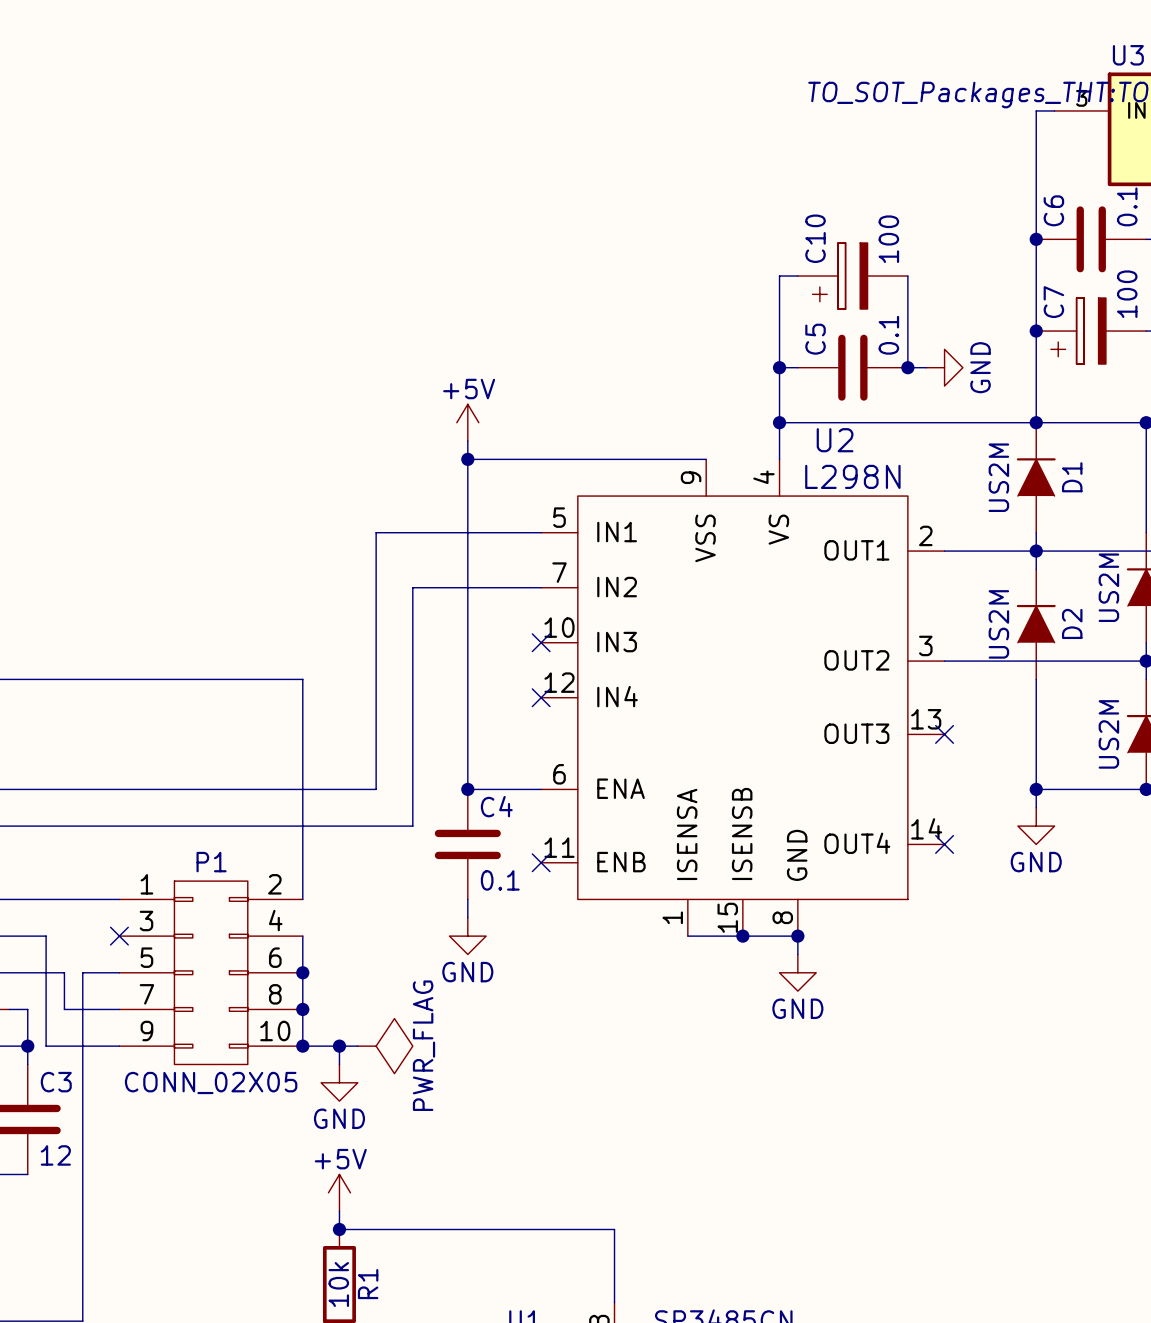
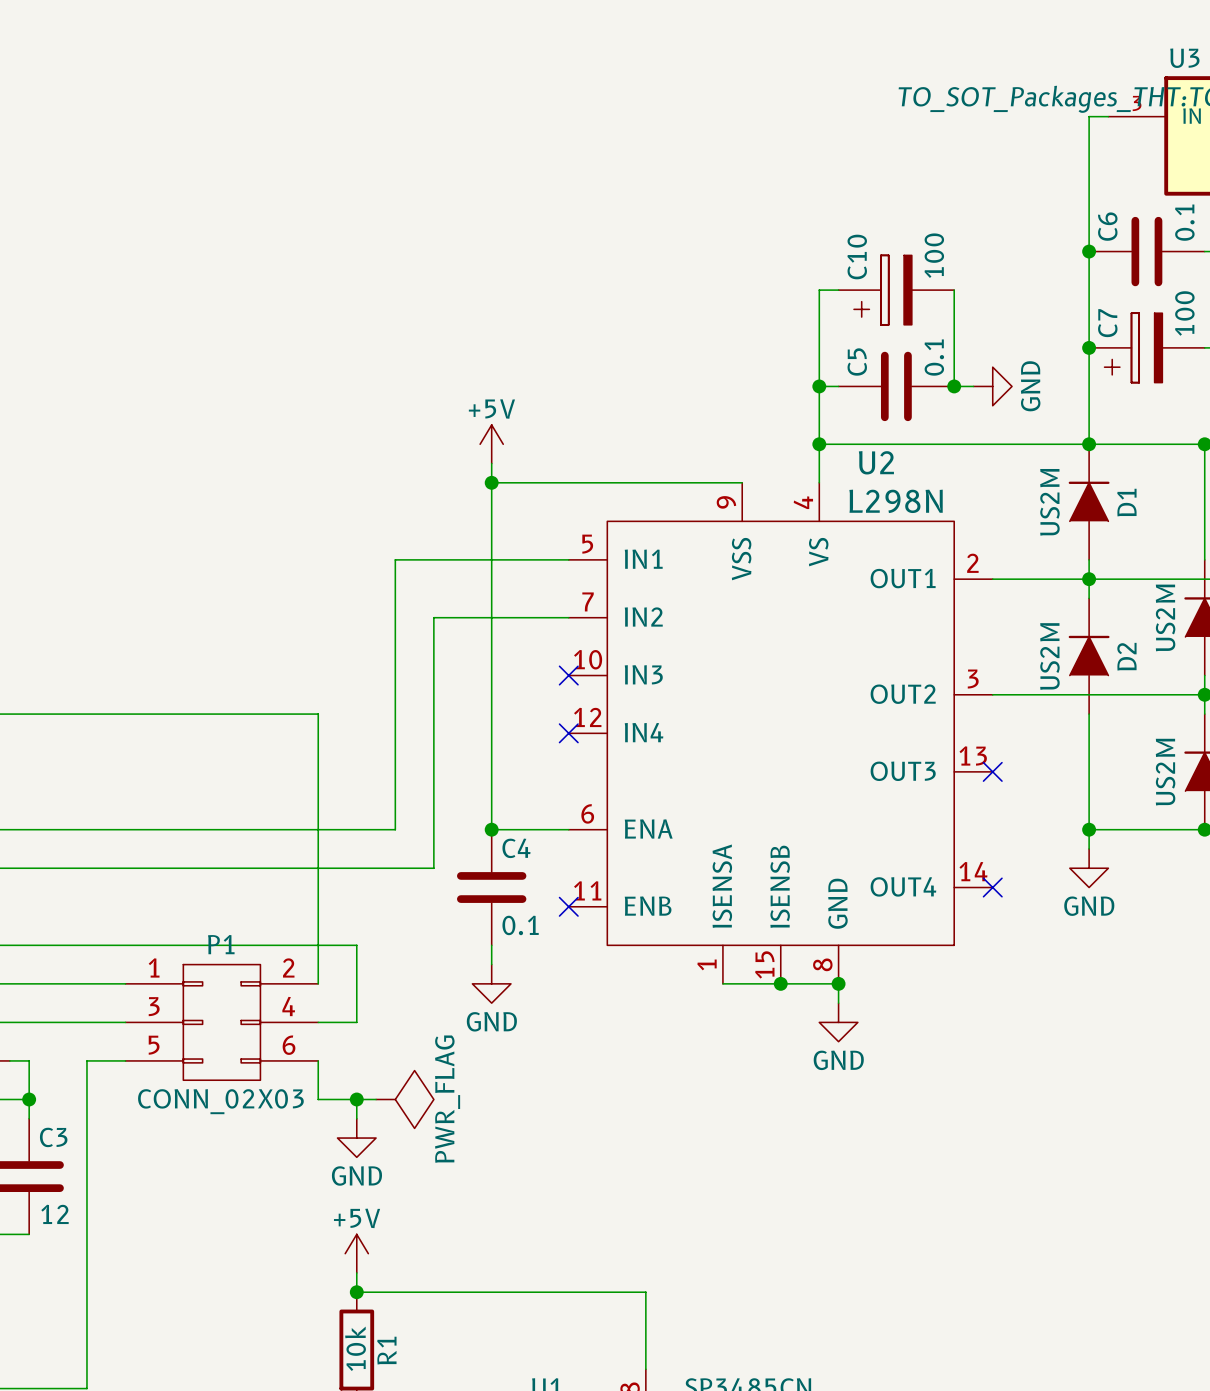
P1 name position: P1 (211, 862) -> P1 (221, 944)
P1 symbol: [119, 881, 303, 1065] -> [125, 964, 319, 1081]
wire: none -> (125, 945) (356, 945) (356, 1022) (318, 1022)
wire: (46, 936) (46, 1046) (119, 1046) -> (48, 983) (125, 983)
no-connect mark: (119, 936) -> none
wire: (302, 936) (302, 1009) -> (318, 983) (318, 945)
wire: (64, 972) (64, 1009) (82, 1009) (82, 972) -> (67, 1022) (86, 1022)
junction: (302, 972) -> none
junction: (302, 1009) -> none
junction: (302, 1046) -> none
P1 value: CONN_02X05 (211, 1082) -> CONN_02X03 (220, 1101)

